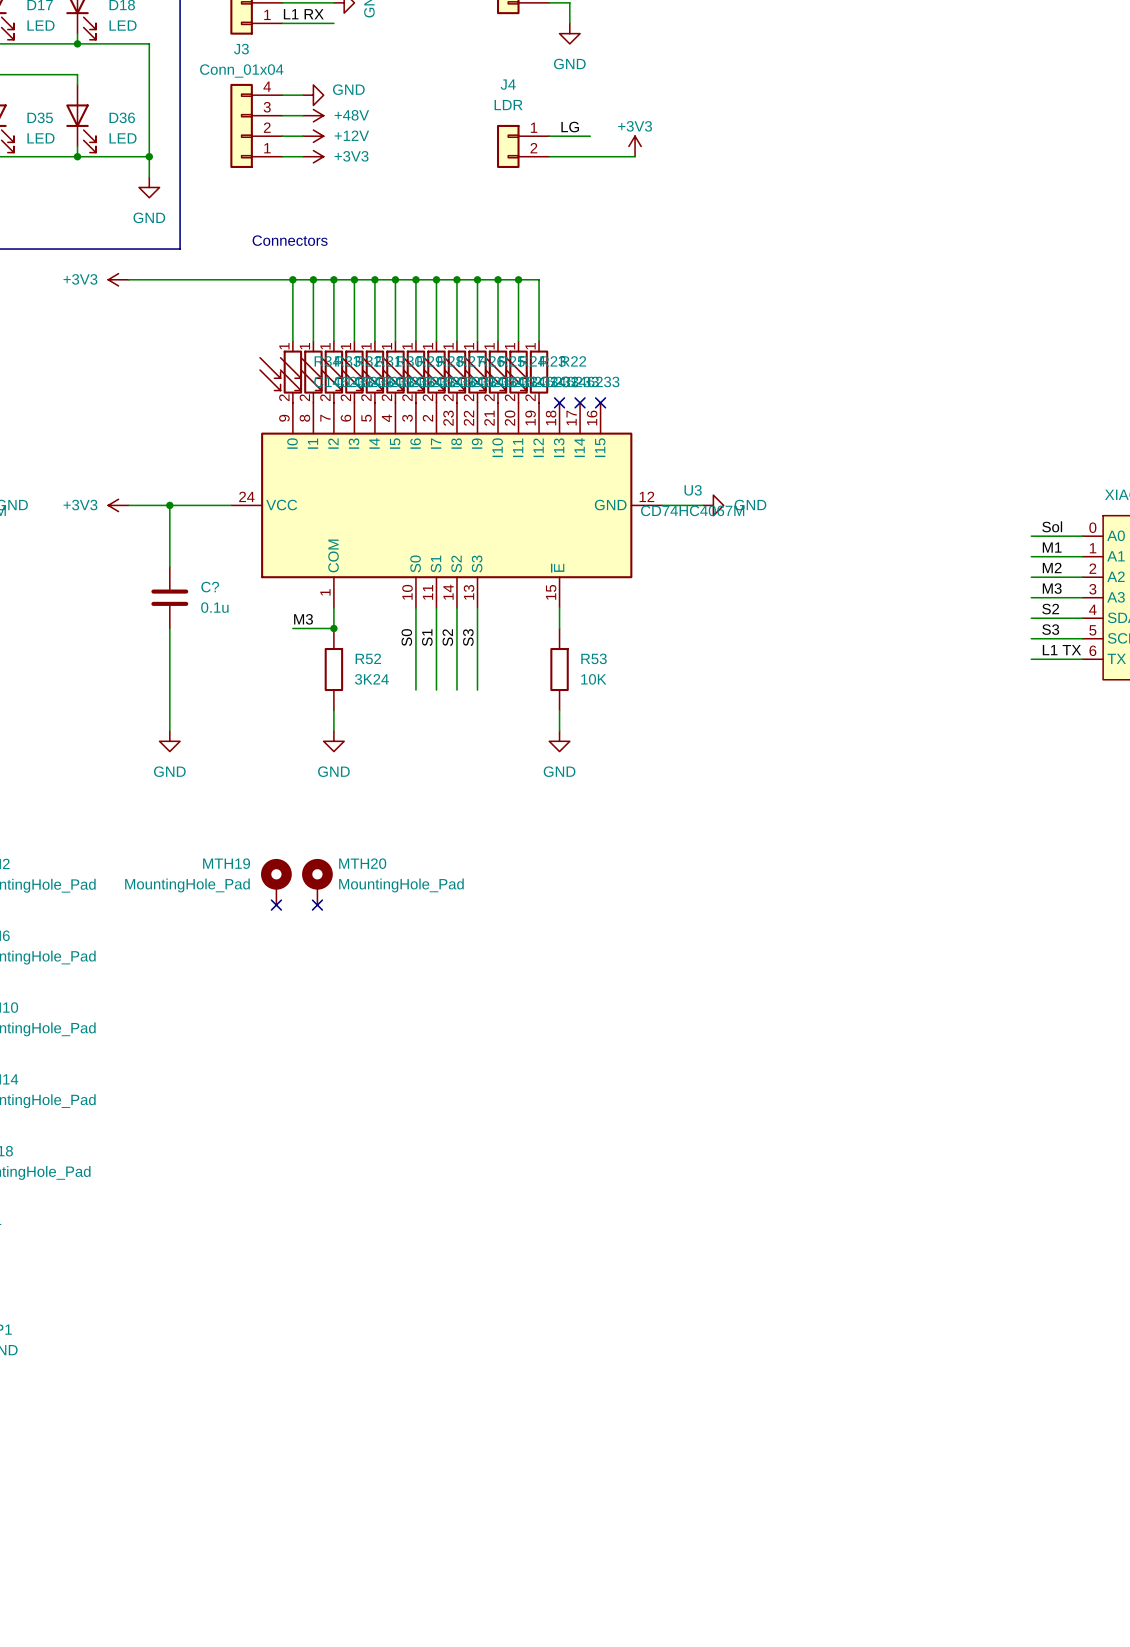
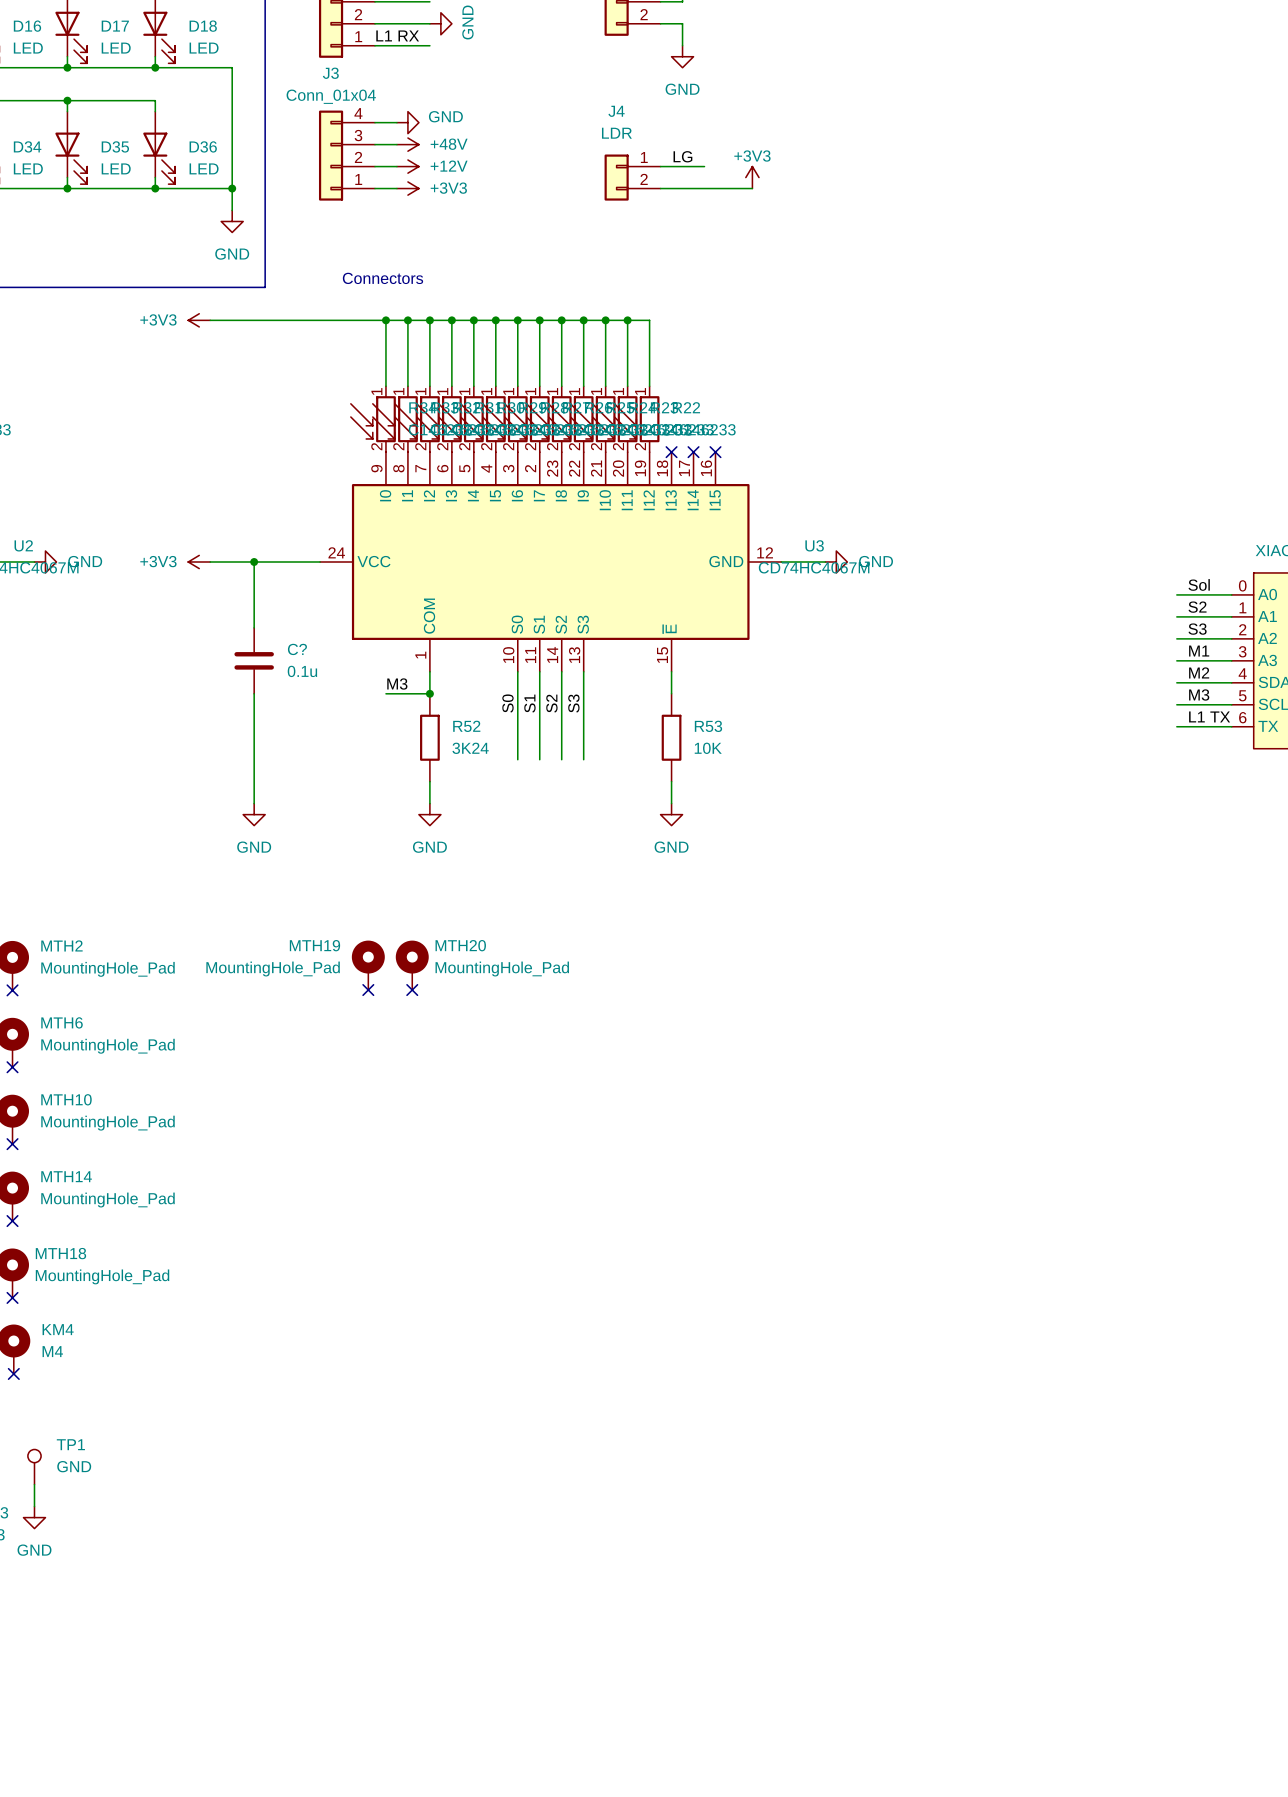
label: M1 (1052, 547) -> S2 (1197, 607)
label: M2 (1052, 567) -> S3 (1197, 629)
label: M3 (1052, 588) -> M1 (1199, 651)
label: S2 (1050, 609) -> M2 (1199, 672)
label: S3 (1050, 629) -> M3 (1199, 694)

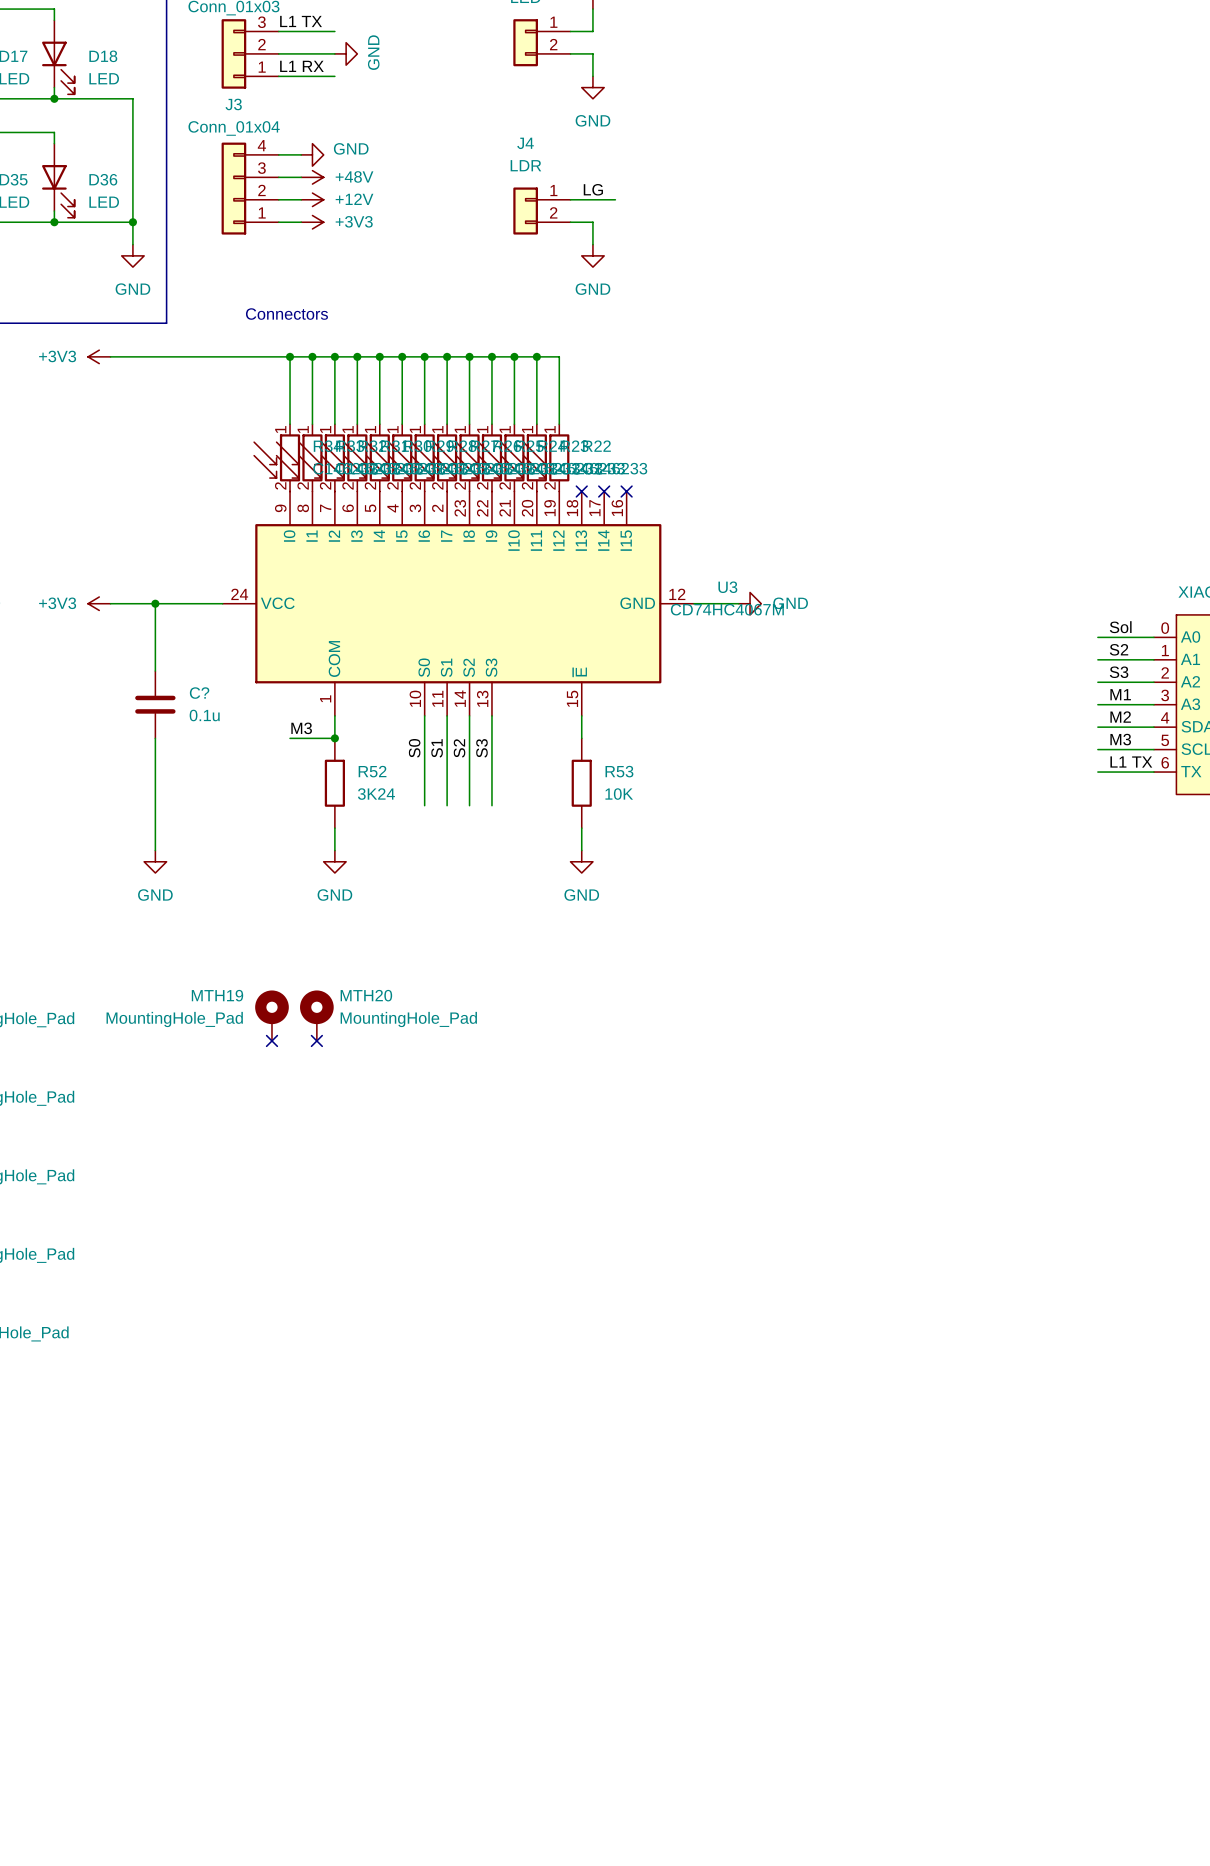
power symbol: +3V3 (752, 177) -> none
wire: (682, 188) (752, 188) -> (592, 222) (592, 244)
power symbol: none -> GND (592, 255)

